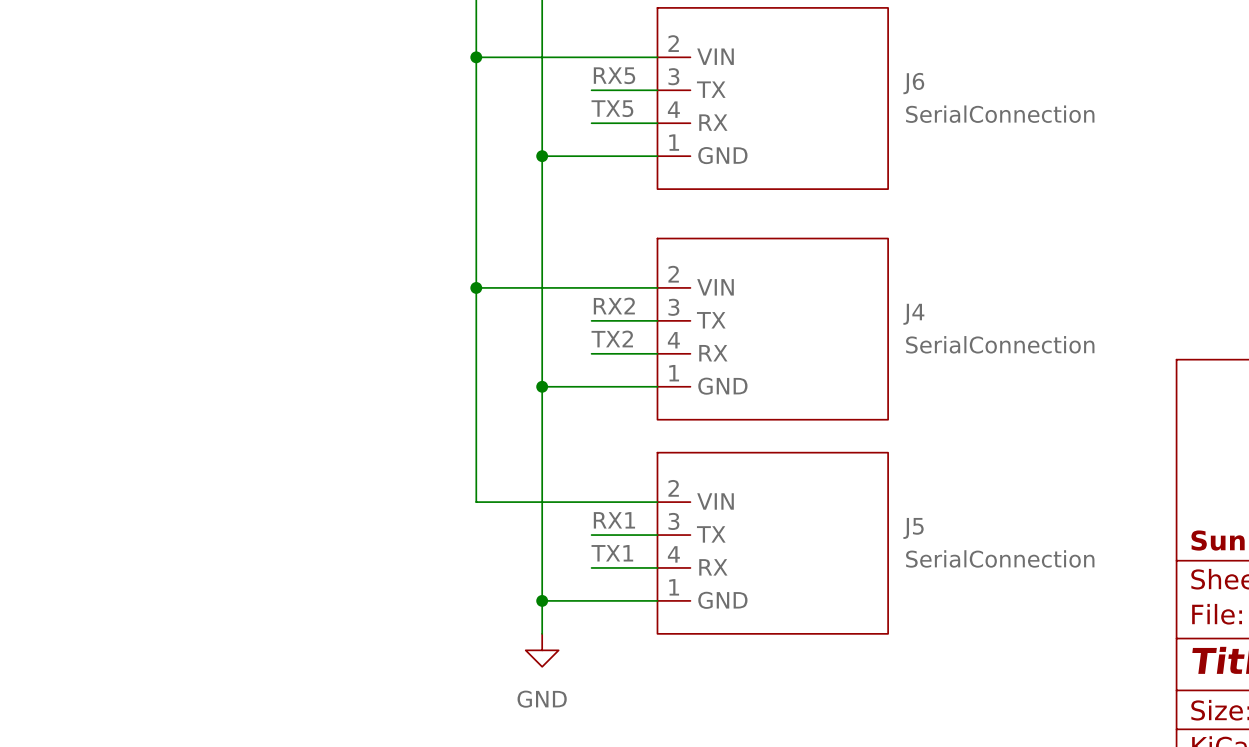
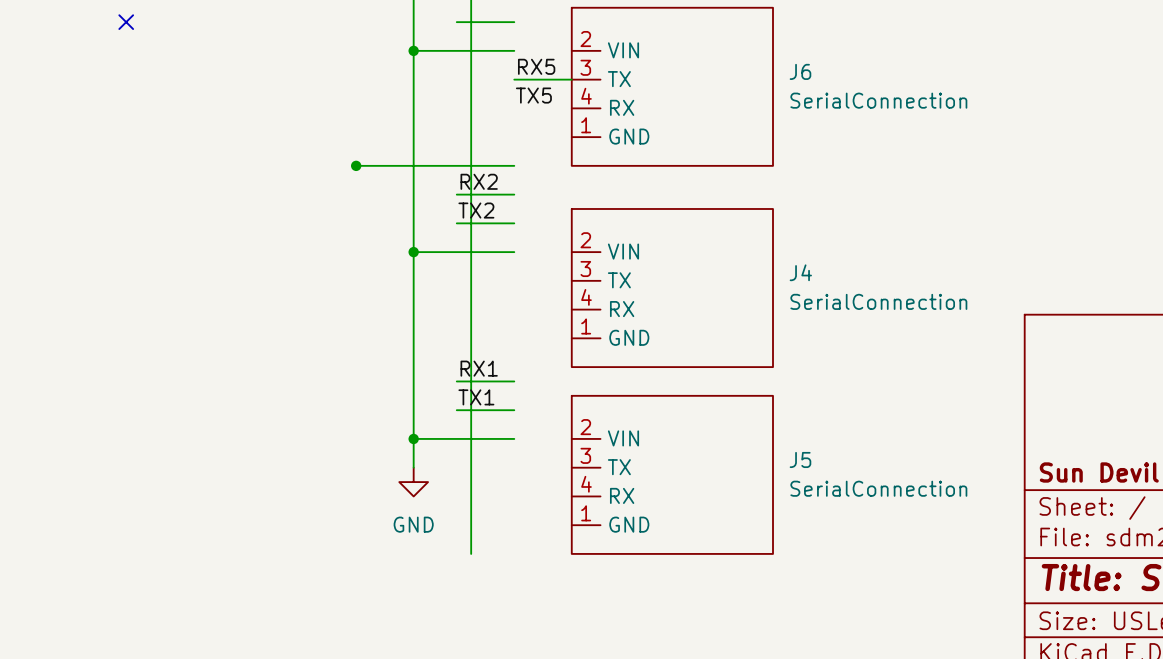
no-connect mark: none -> (126, 22)
wire: (591, 57) (657, 57) -> none
wire: (591, 123) (657, 123) -> (456, 22) (514, 22)
wire: (542, 156) (657, 156) -> none
junction: (542, 156) -> none
wire: none -> (356, 165) (514, 165)
junction: none -> (356, 165)
wire: (591, 287) (657, 287) -> none
label position: RX2 (614, 306) -> RX2 (479, 181)
wire: (591, 320) (657, 320) -> (456, 194) (514, 194)
label position: TX2 (612, 338) -> TX2 (476, 210)
wire: (591, 353) (657, 353) -> (456, 223) (514, 223)
wire: (542, 386) (657, 386) -> none
junction: (542, 386) -> none
wire: none -> (413, 438) (413, 467)
junction: none -> (413, 438)
wire: (591, 502) (657, 502) -> none
label position: RX1 (614, 520) -> RX1 (479, 368)
wire: (591, 535) (657, 535) -> (456, 381) (514, 381)
label position: TX1 (612, 553) -> TX1 (476, 397)
wire: (591, 567) (657, 567) -> (456, 410) (514, 410)
wire: (542, 600) (657, 600) -> none
junction: (542, 600) -> none
power symbol position: GND (542, 650) -> GND (413, 482)

